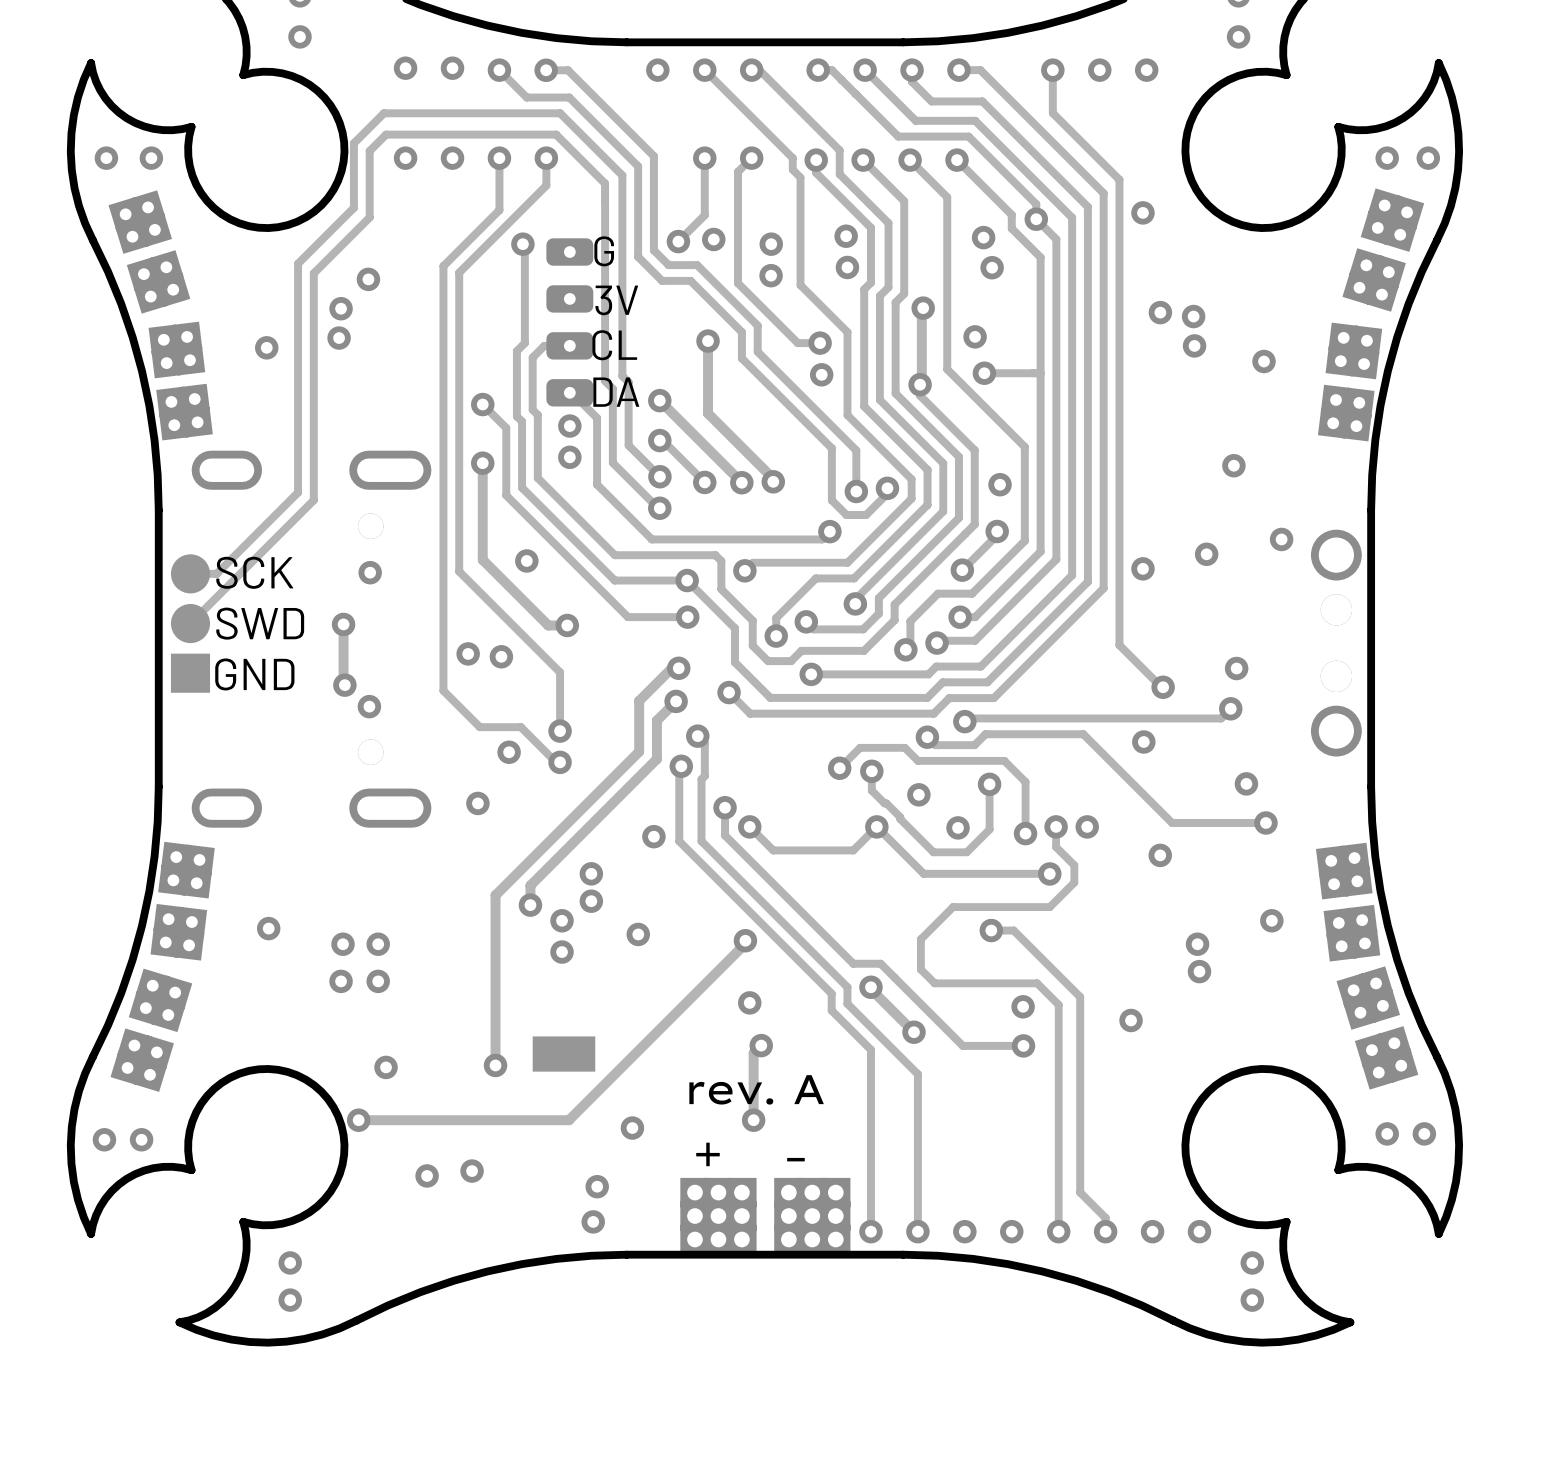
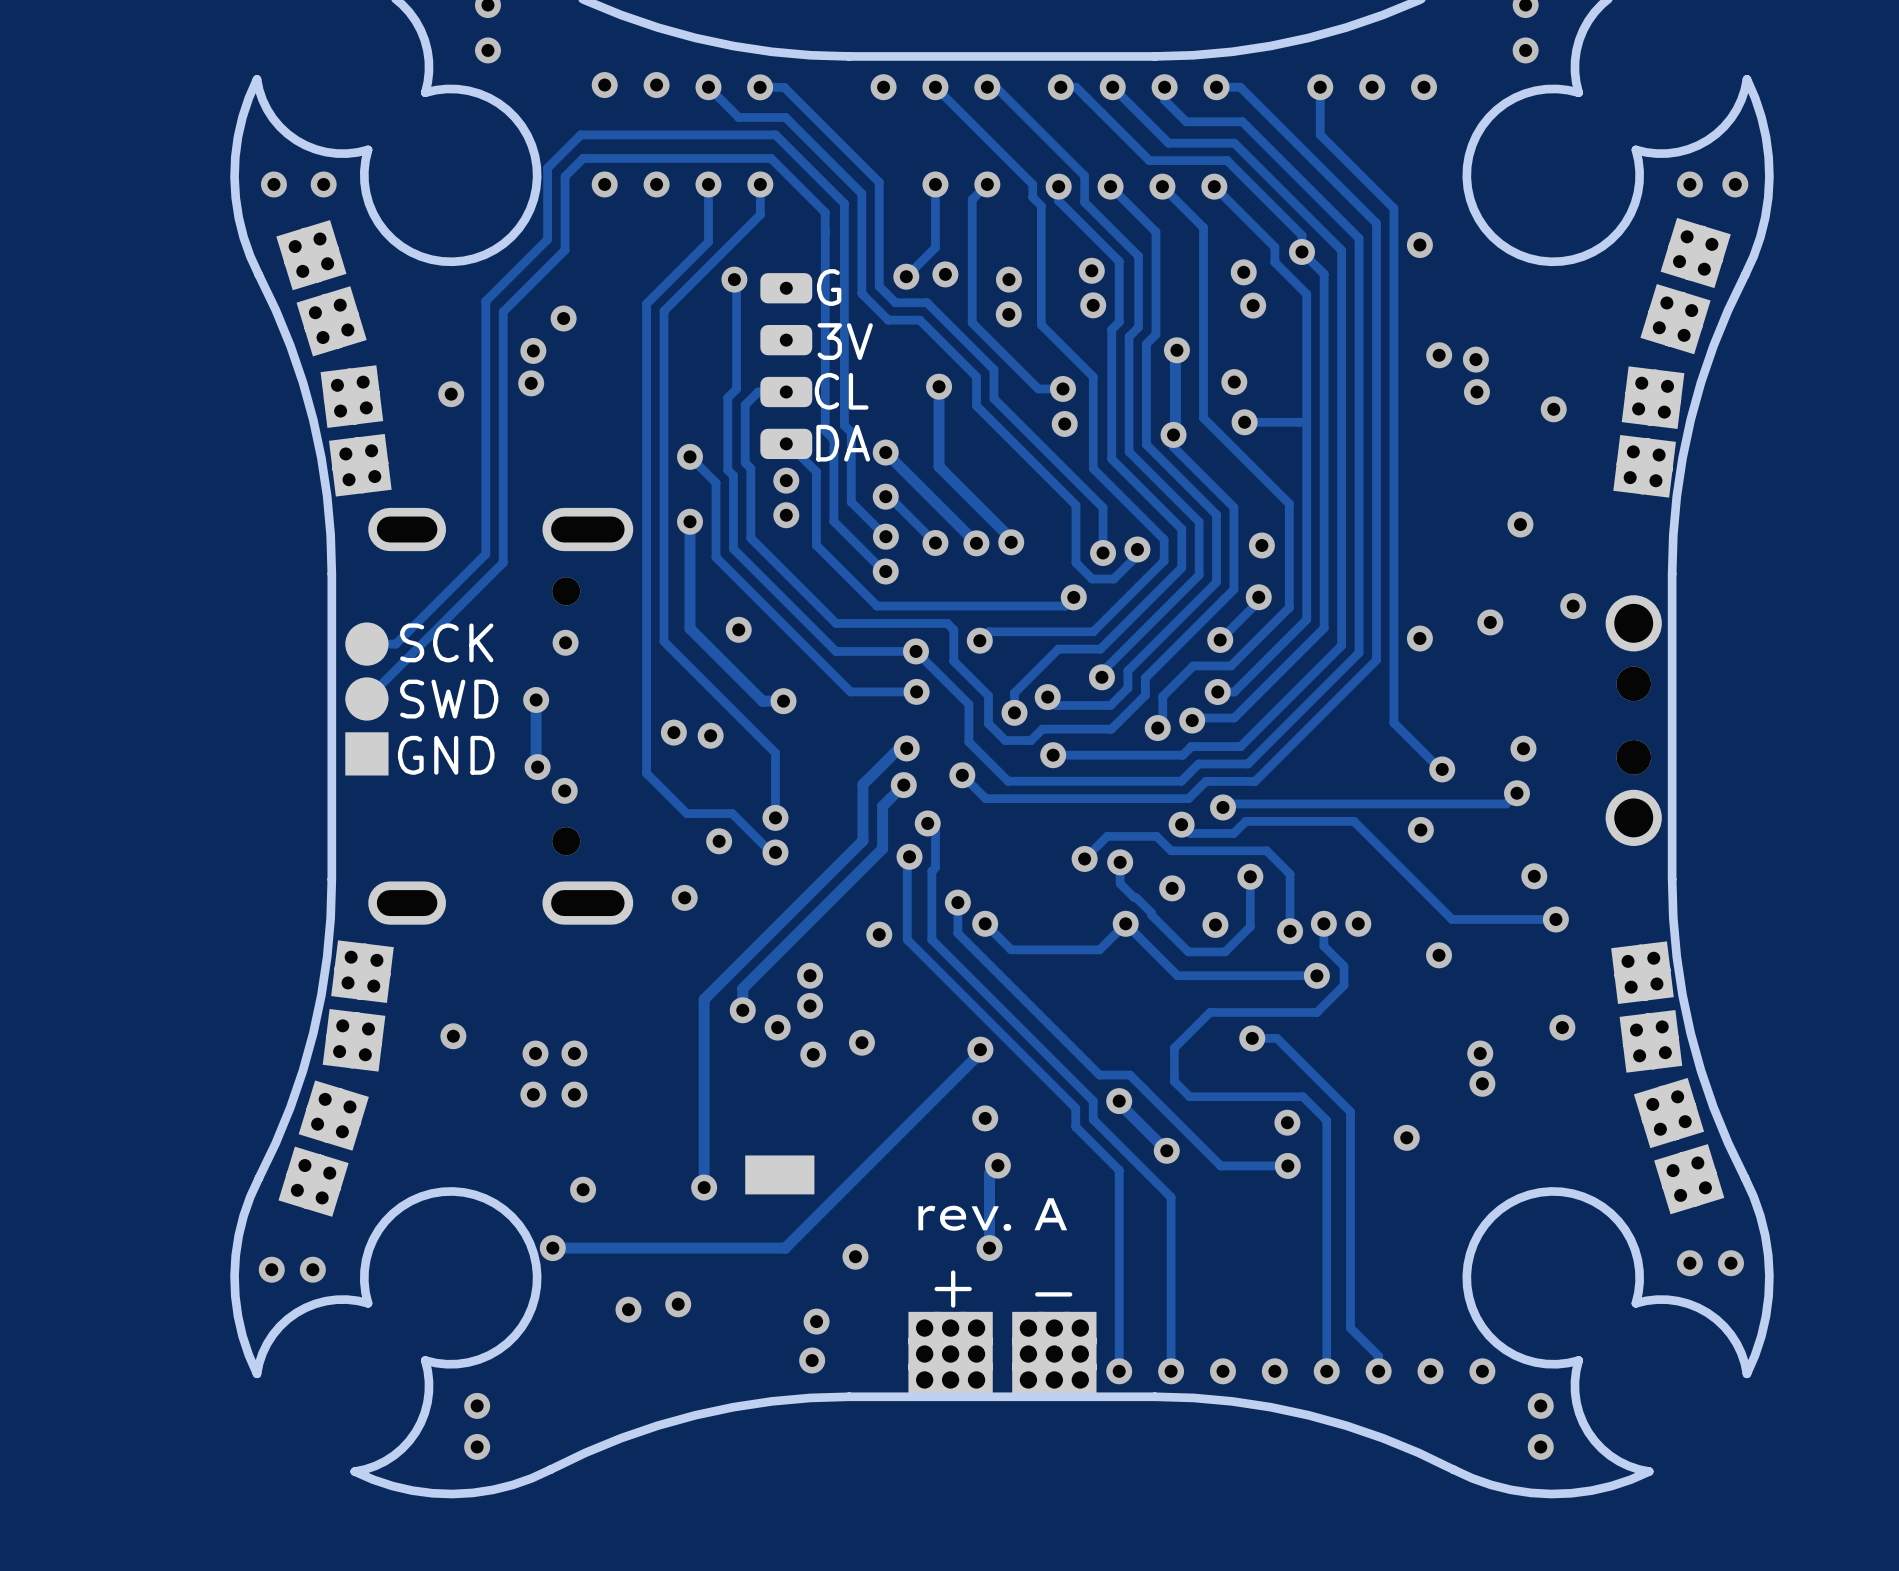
via position: (562, 952) -> (813, 1054)

